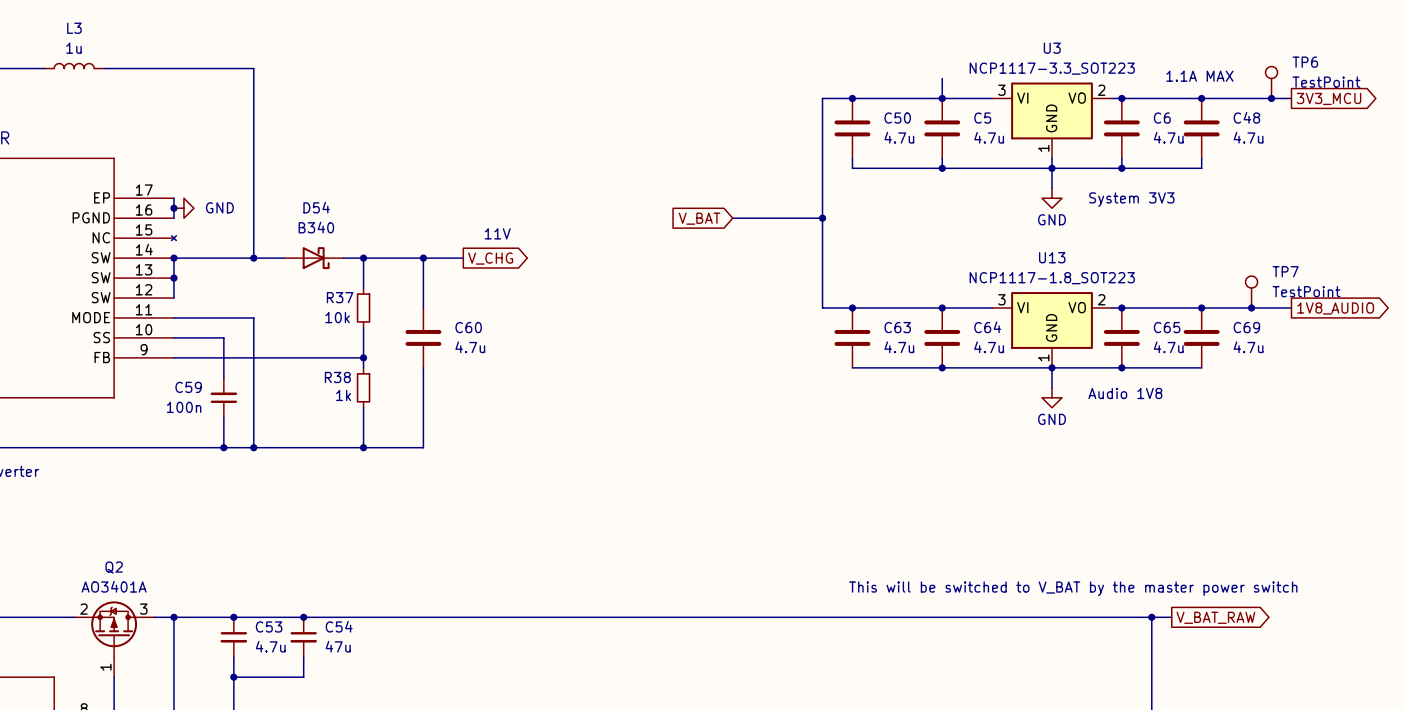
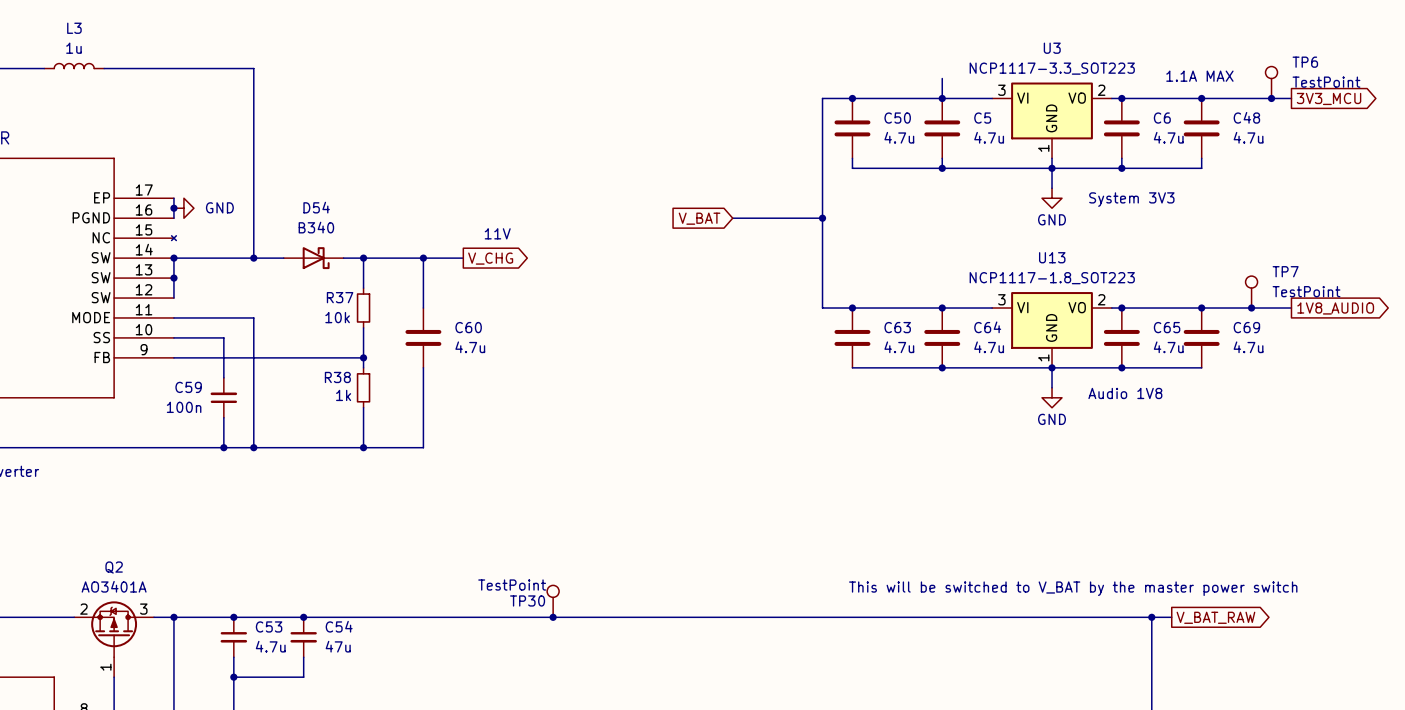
TP30: none -> TestPoint (553, 601)
junction: none -> (553, 617)

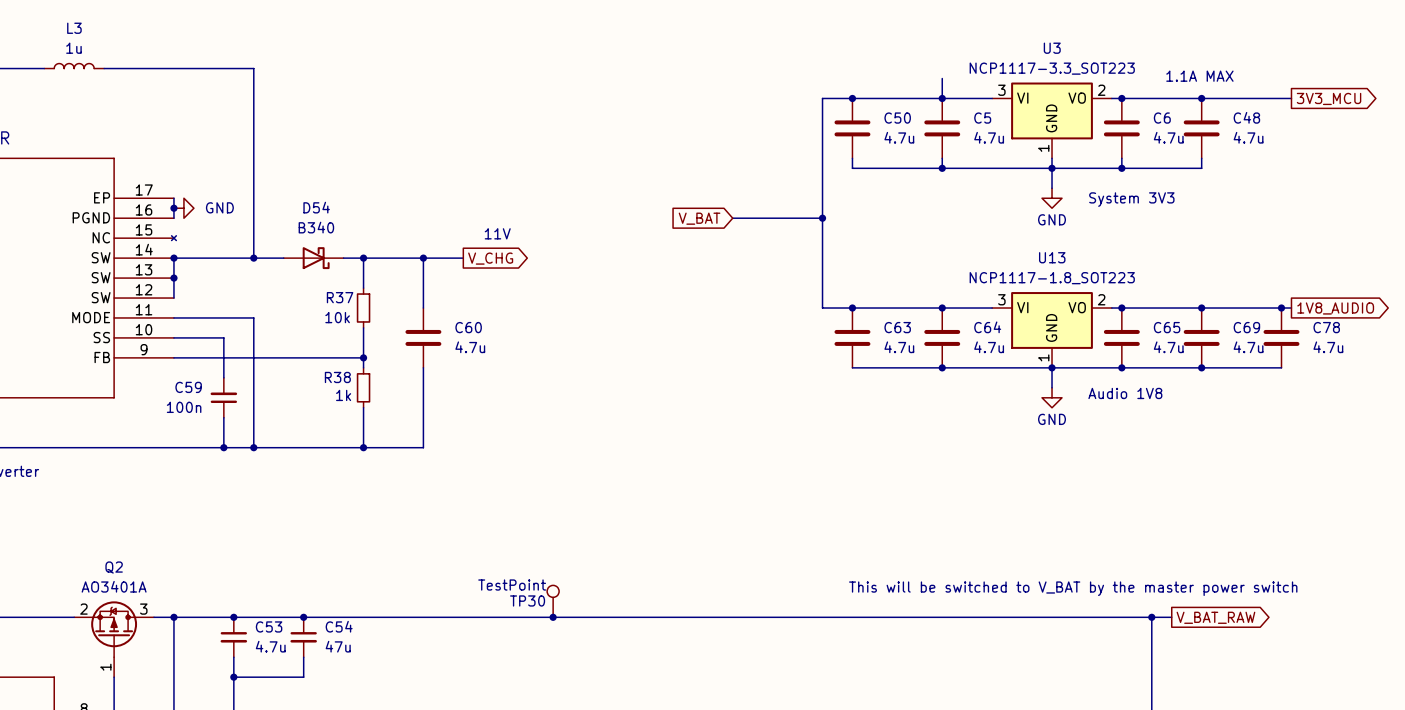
TP6: TestPoint (1271, 82) -> none
junction: (1271, 98) -> none
TP7: TestPoint (1251, 292) -> none
junction position: (1251, 308) -> (1281, 308)
C78: none -> 4.7u (1281, 337)
wire: none -> (1201, 367) (1281, 367)
junction: none -> (1201, 367)

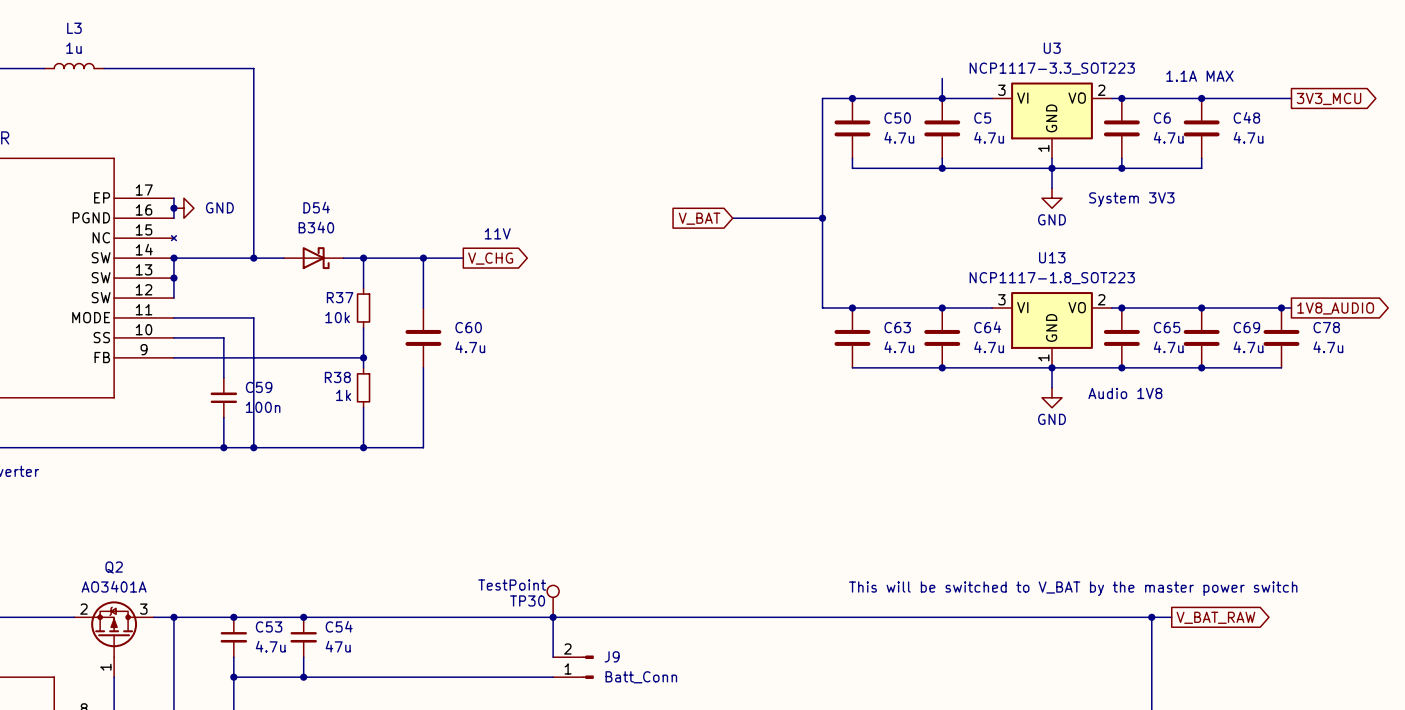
C59 name position: C59 (188, 387) -> C59 (259, 387)
C59 value position: 100n (184, 407) -> 100n (263, 407)
wire: none -> (553, 617) (553, 657)
J9: none -> Batt_Conn (573, 667)
wire: none -> (303, 677) (553, 677)
junction: none -> (303, 677)

